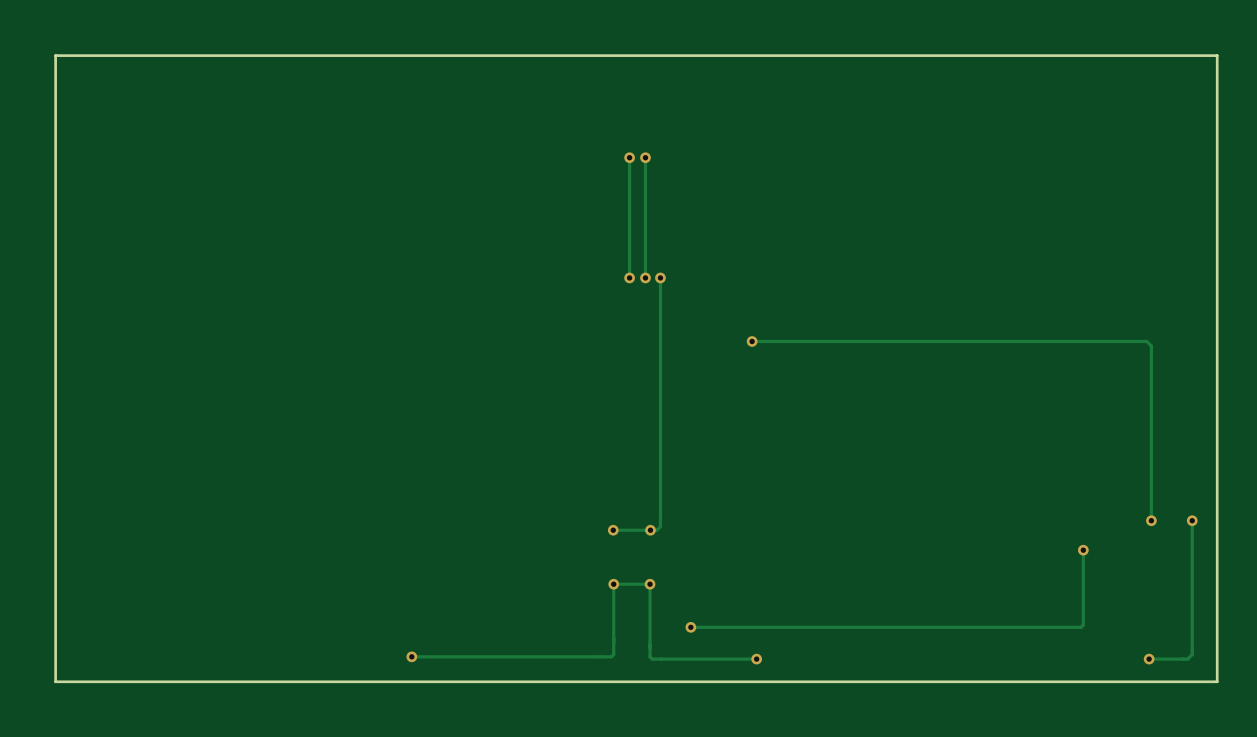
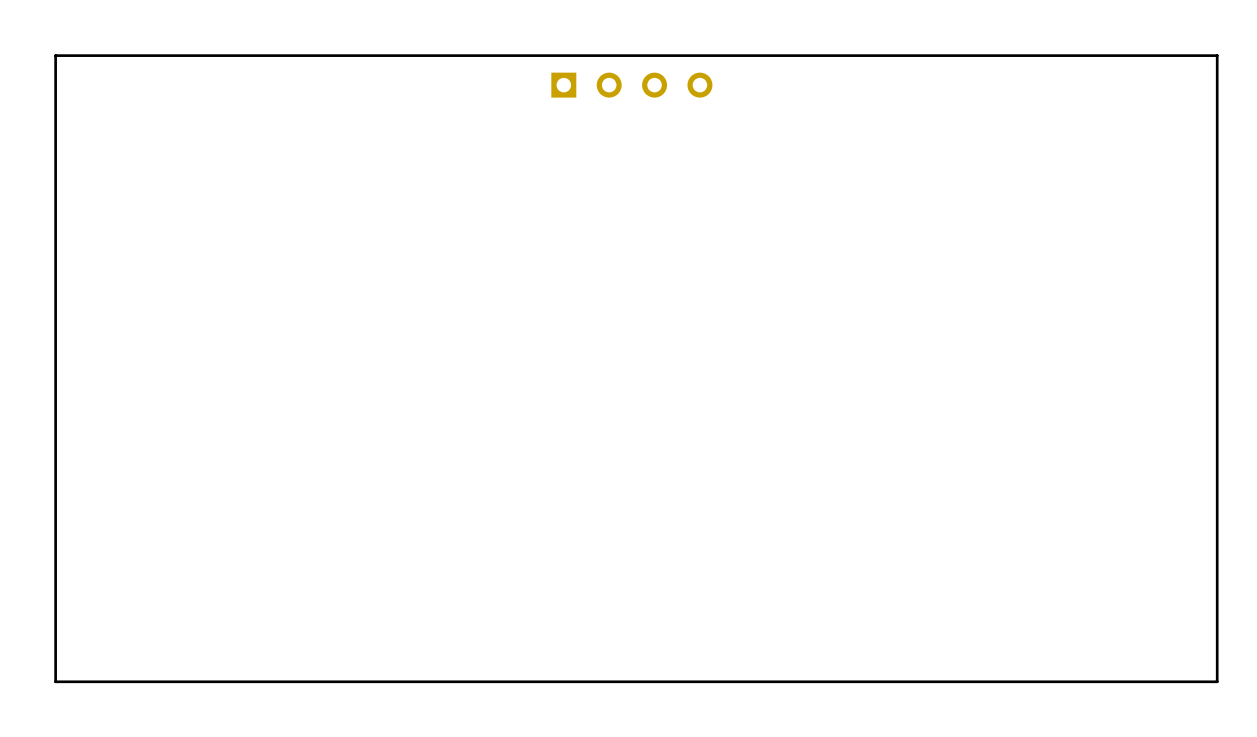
part: none -> (631, 85)
track: (629, 157) (629, 277) -> none
via: (629, 157) -> none
track: (645, 157) (645, 277) -> none
via: (645, 157) -> none
via: (629, 277) -> none
via: (645, 277) -> none
track: (660, 277) (660, 526) (656, 530) (613, 530) -> none
via: (660, 277) -> none
track: (752, 341) (1146, 341) (1151, 346) (1151, 520) -> none
via: (752, 341) -> none
via: (1151, 520) -> none
track: (1192, 520) (1192, 654) (1187, 659) (1149, 659) -> none
via: (1192, 520) -> none
via: (613, 530) -> none
via: (650, 530) -> none
track: (1083, 550) (1083, 625) (1081, 627) (690, 627) -> none
via: (1083, 550) -> none
via: (613, 584) -> none
via: (650, 584) -> none
via: (690, 627) -> none
track: (411, 656) (611, 656) (613, 654) (613, 584) (650, 584) (650, 656) (652, 659) (756, 659) -> none
via: (411, 656) -> none
via: (756, 659) -> none
via: (1149, 659) -> none

